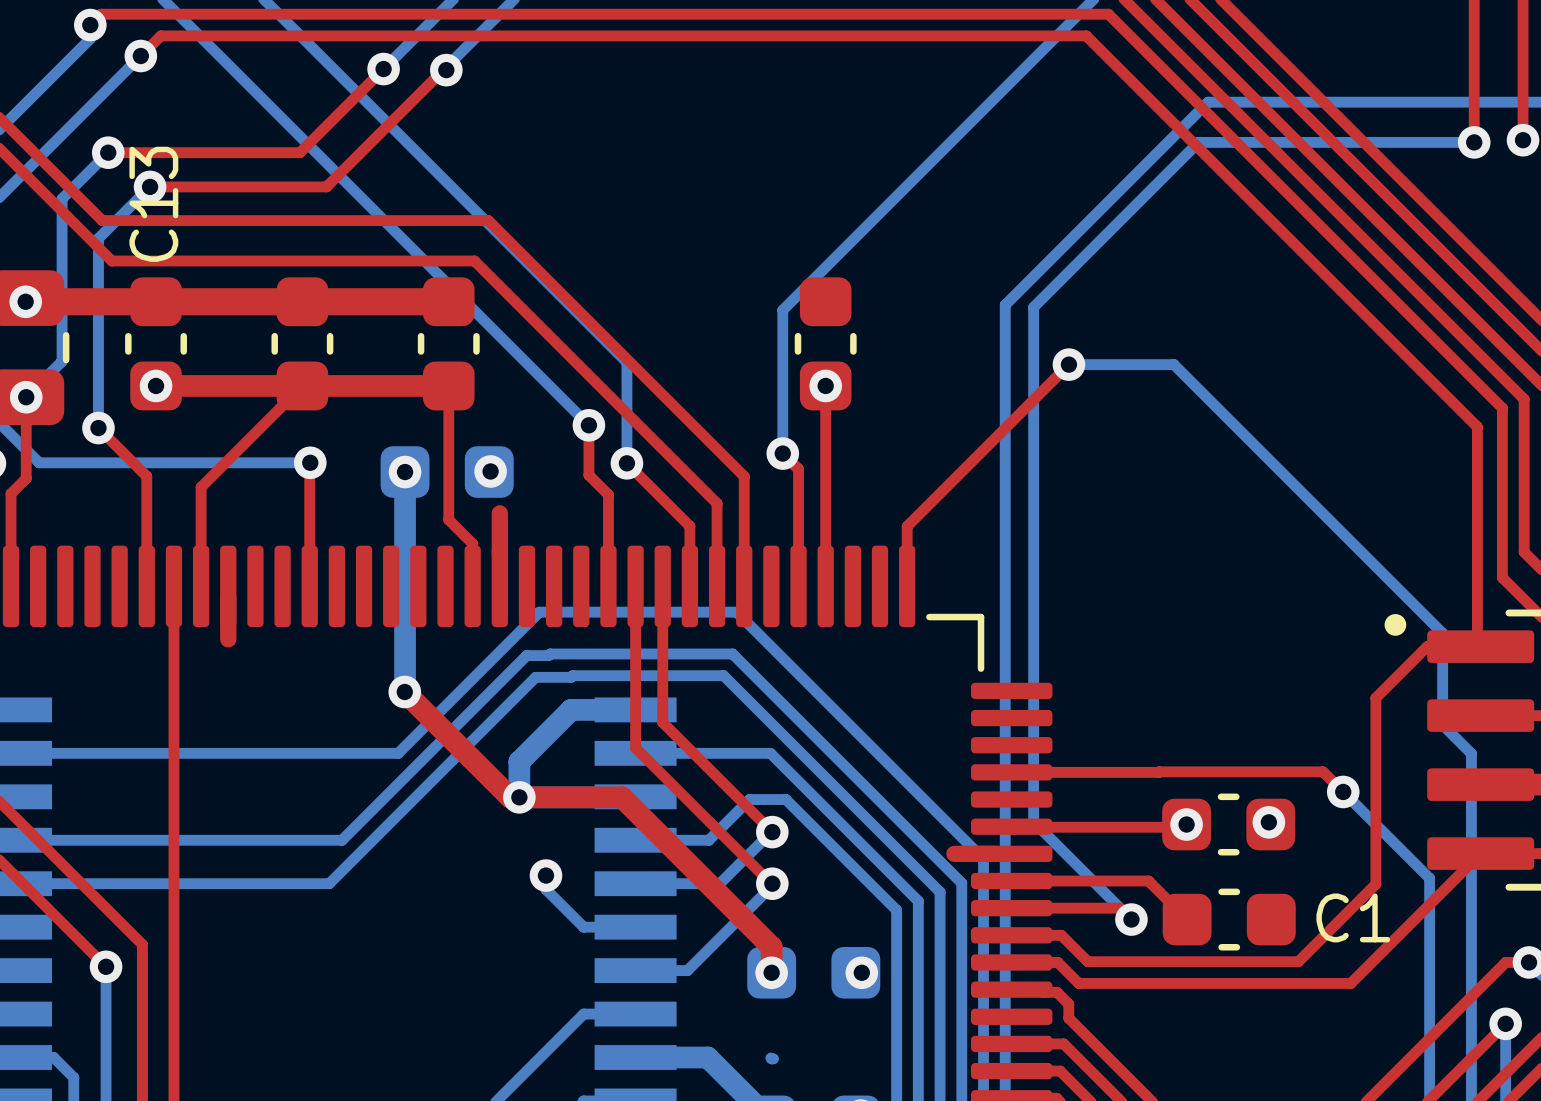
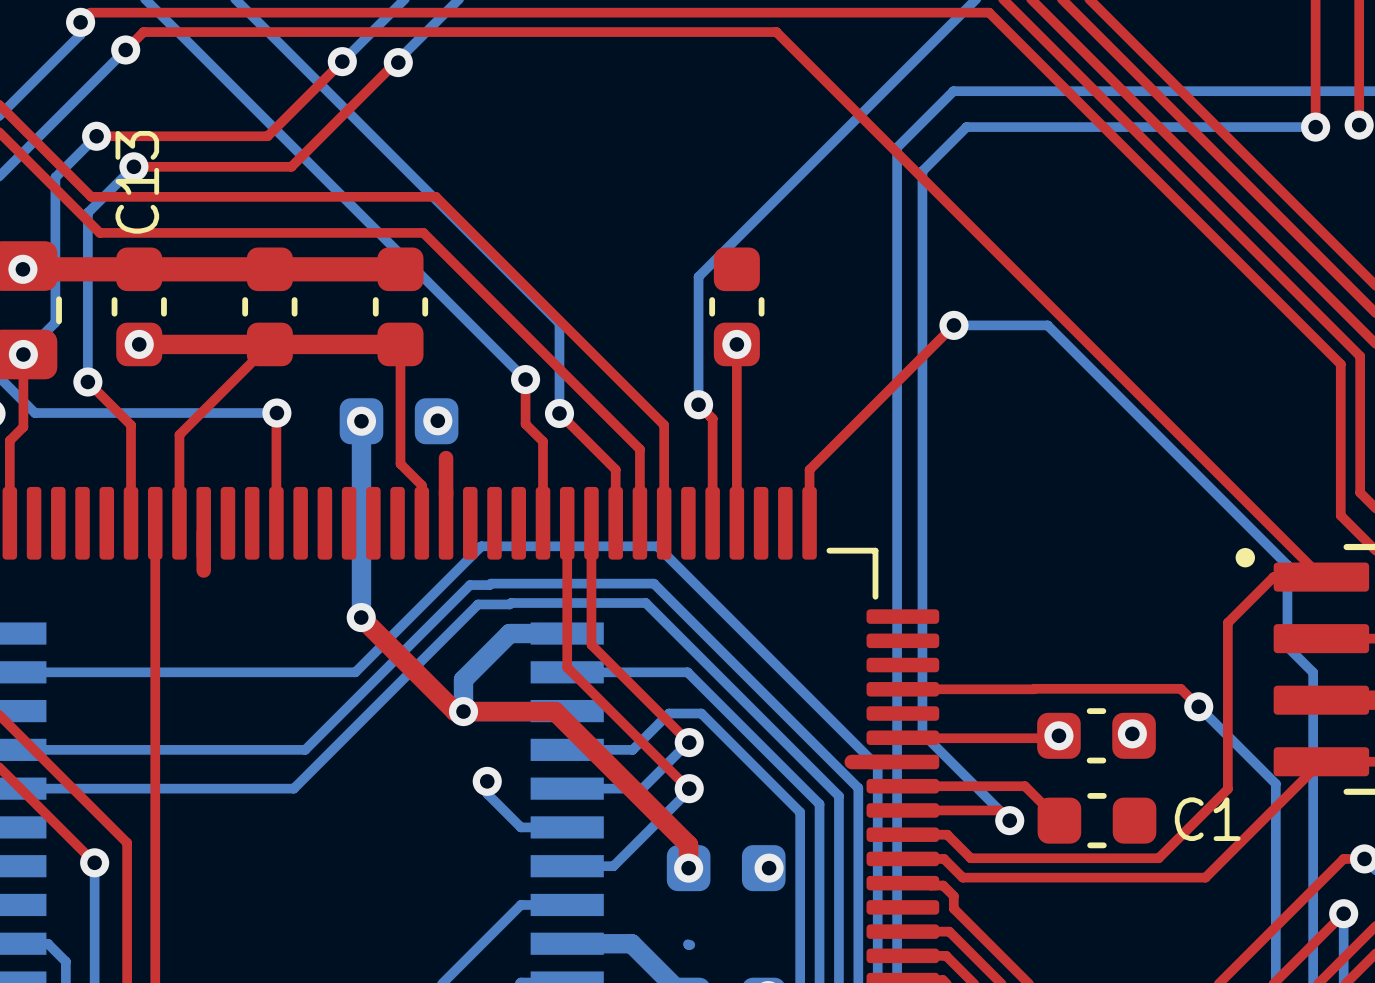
top track: (869, 35) (1086, 35) (1477, 426) (1477, 643) -> (776, 32) (1318, 574)
bottom track: (1208, 102) (1005, 304) -> (1078, 91) (953, 91) (897, 147) (897, 272)
bottom track: (1198, 142) (1033, 307) -> (1069, 127) (966, 127) (922, 171) (922, 274)

